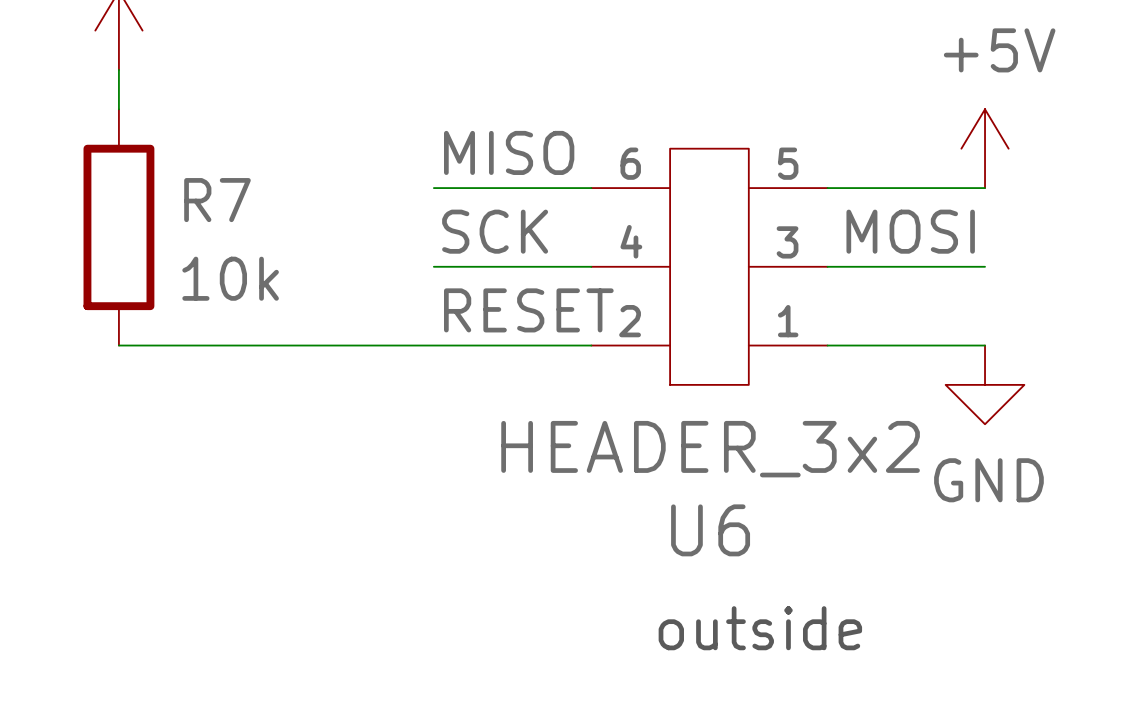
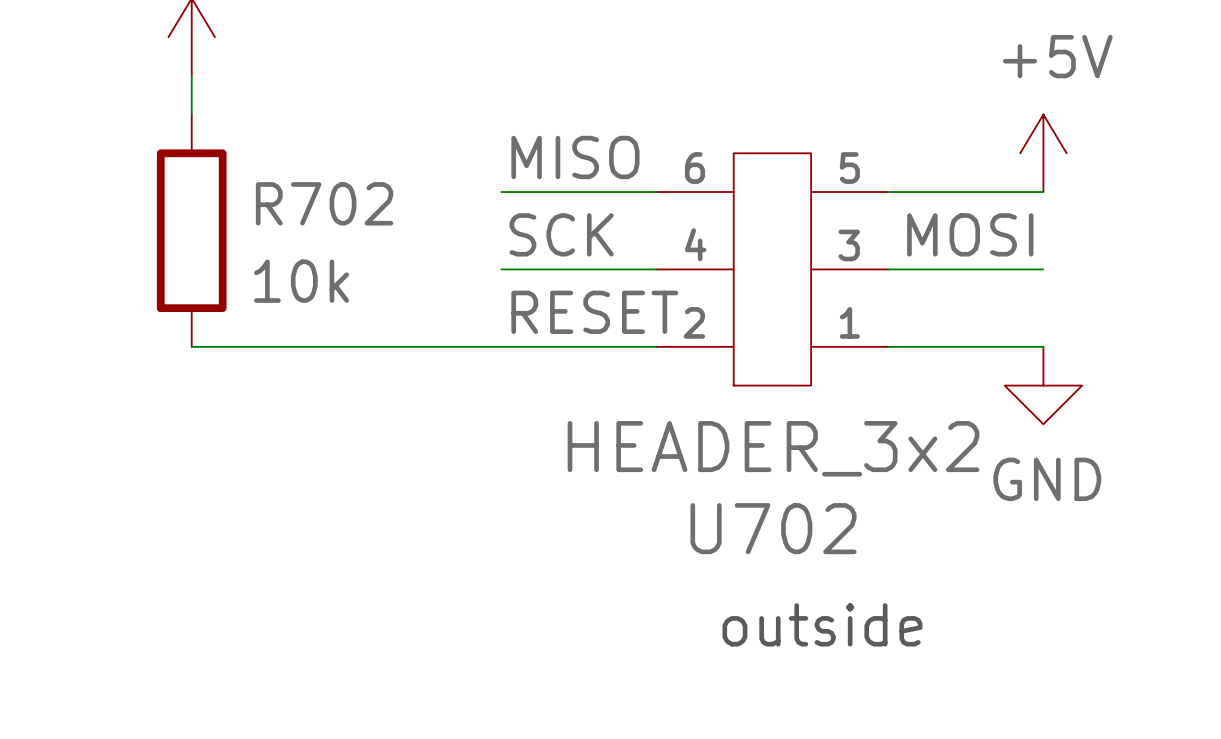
R7 name: R7 (217, 200) -> R702 (324, 203)
U6 name: U6 (710, 530) -> U702 (773, 528)

